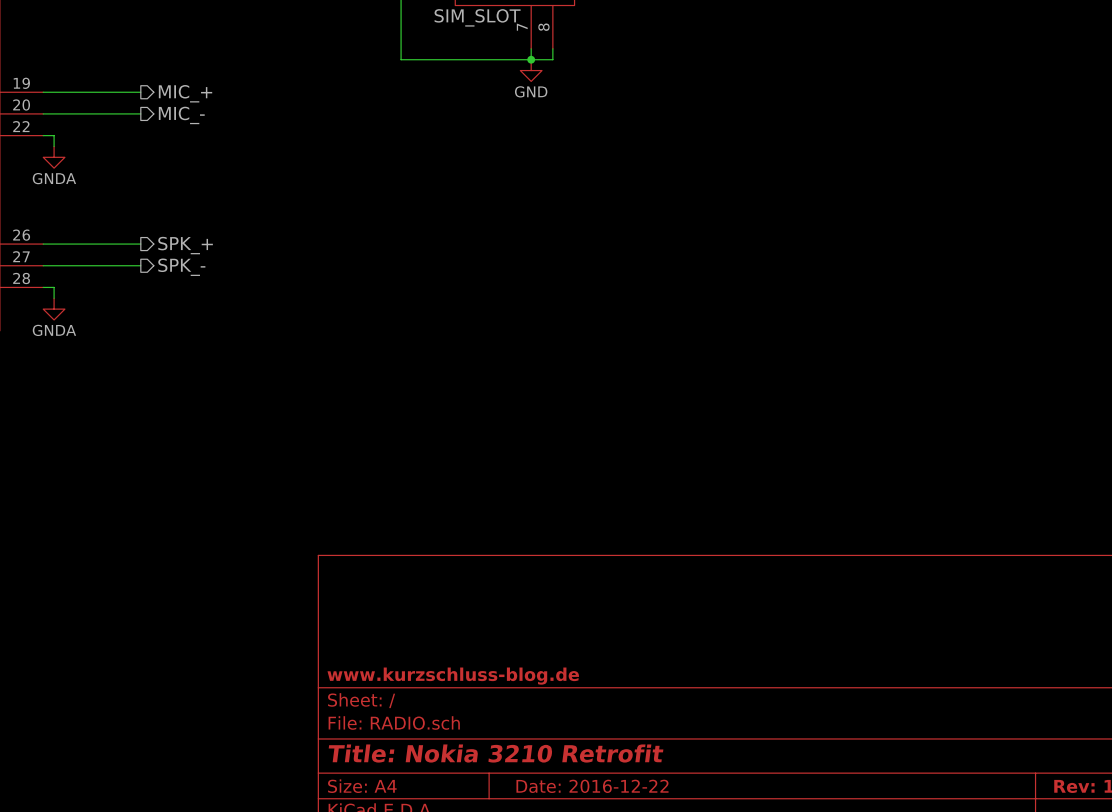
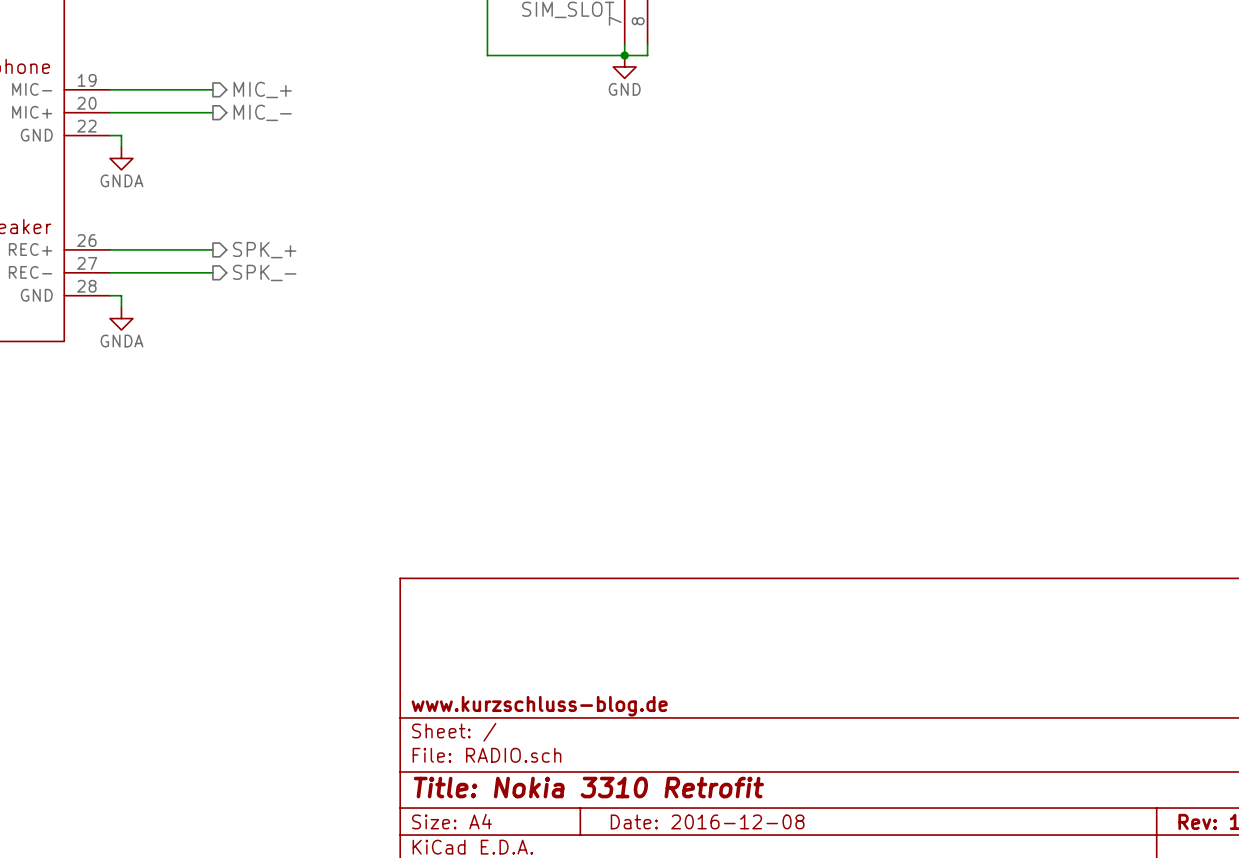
title block: Title: Nokia 3210 Retrofit (496, 753) -> Title: Nokia 3310 Retrofit (588, 787)
title block: Date: 2016-12-22 (592, 786) -> Date: 2016-12-08 (707, 821)

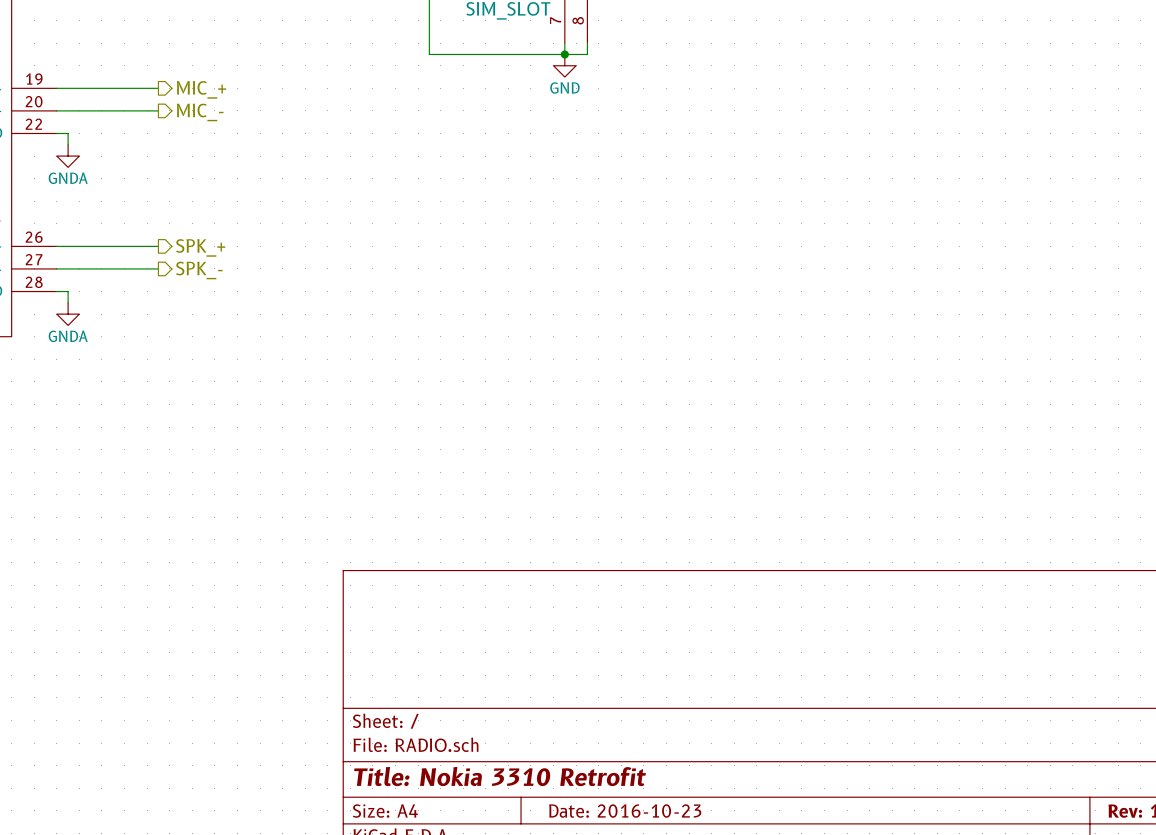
title block: www.kurzschluss-blog.de (539, 706) -> none
title block: Date: 2016-12-08 (707, 821) -> Date: 2016-10-23 (625, 811)

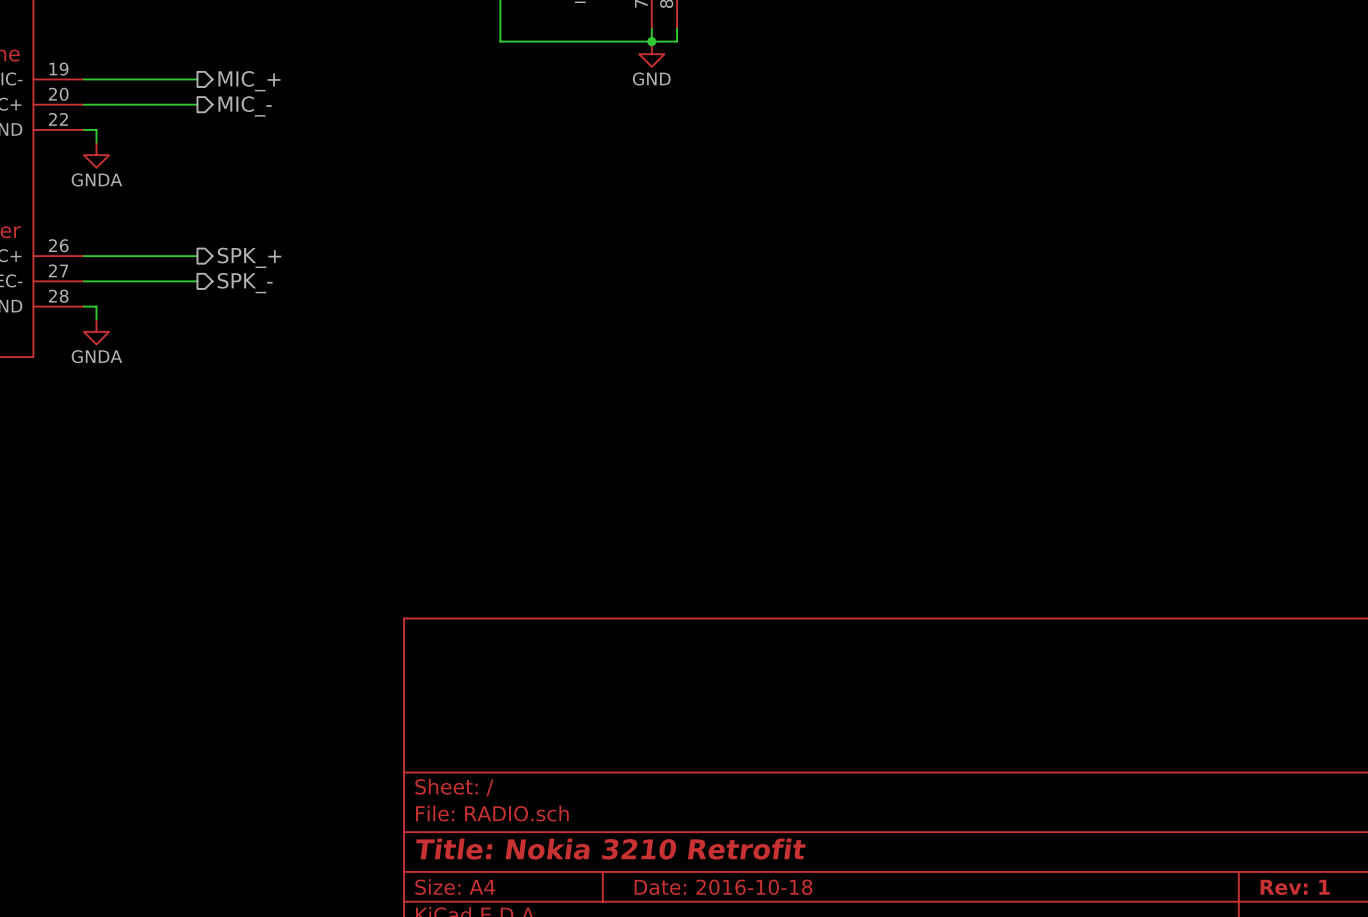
title block: Title: Nokia 3310 Retrofit (500, 776) -> Title: Nokia 3210 Retrofit (610, 849)
title block: Date: 2016-10-23 (625, 811) -> Date: 2016-10-18 (723, 887)

